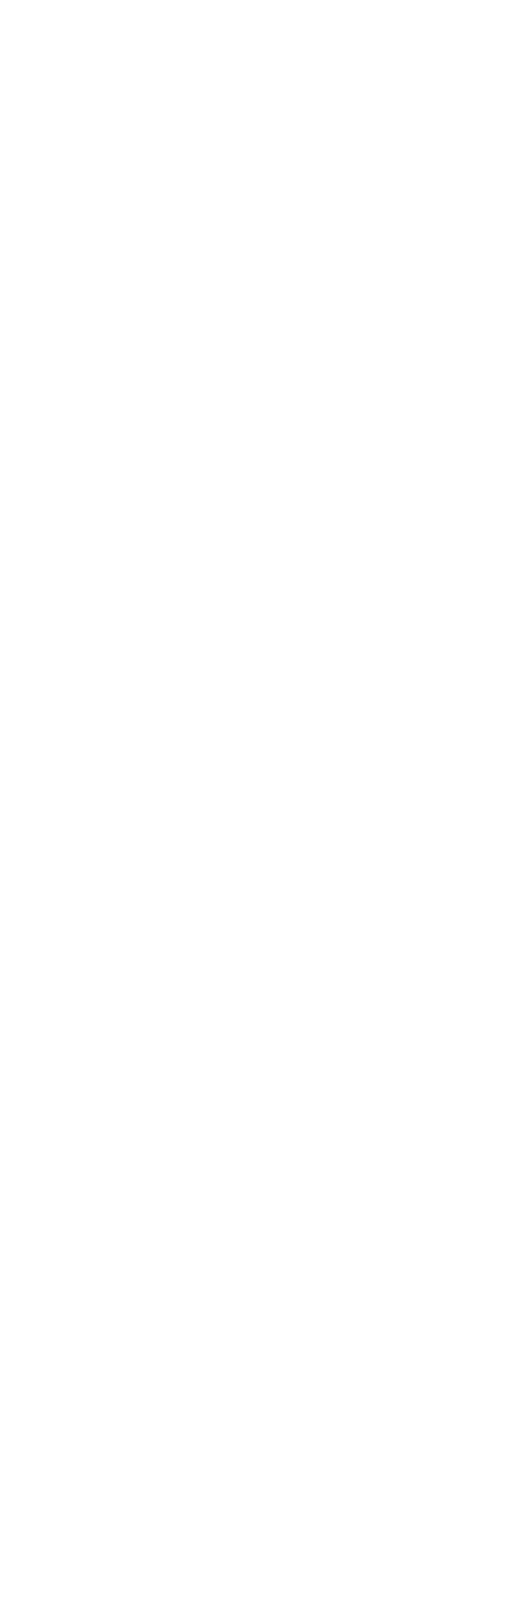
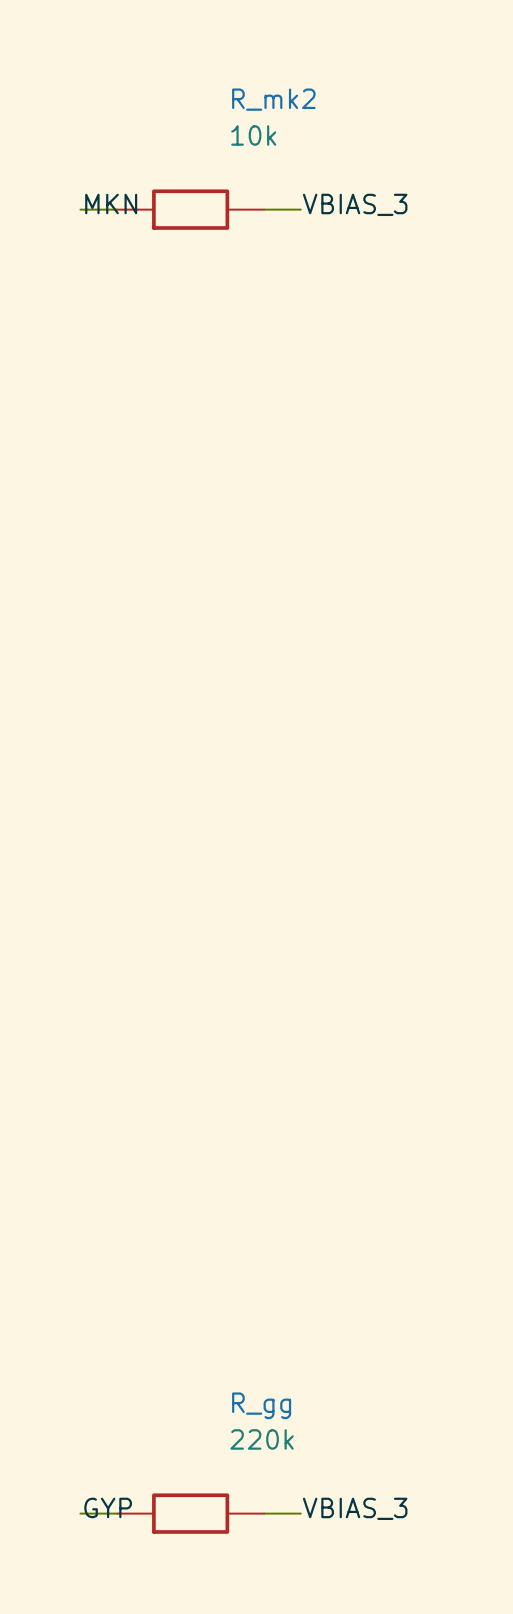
label: none -> MKN (111, 203)
label: none -> VBIAS_3 (355, 204)
wire: none -> (80, 209) (117, 209)
R_mk2: none -> 10k (190, 209)
wire: none -> (264, 209) (300, 209)
label: none -> GYP (108, 1507)
label: none -> VBIAS_3 (355, 1508)
wire: none -> (80, 1513) (117, 1513)
R_gg: none -> 220k (190, 1513)
wire: none -> (264, 1513) (300, 1513)

